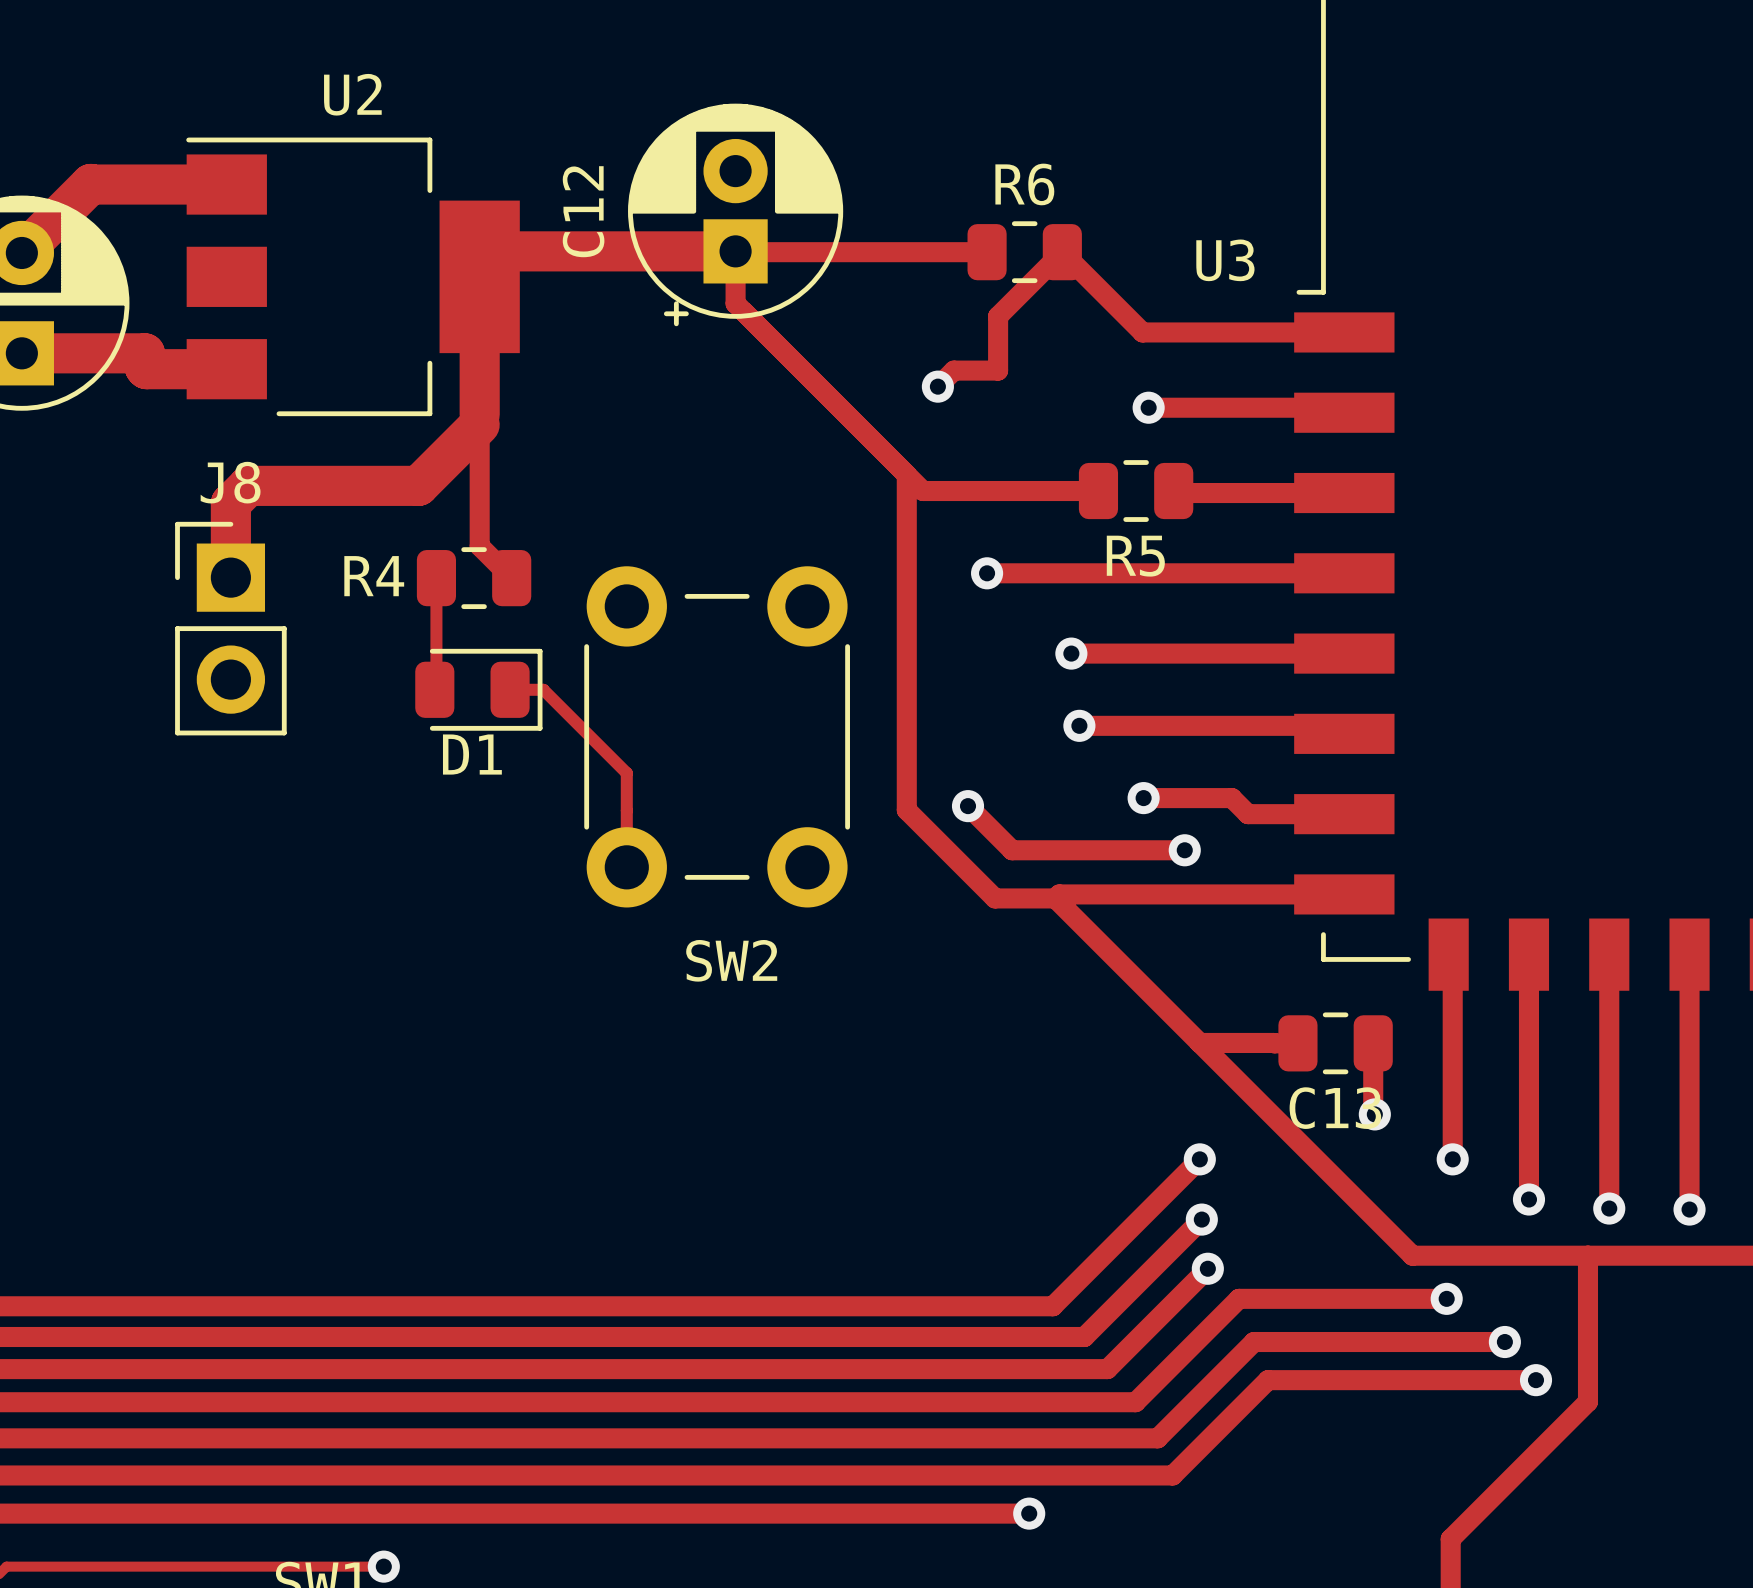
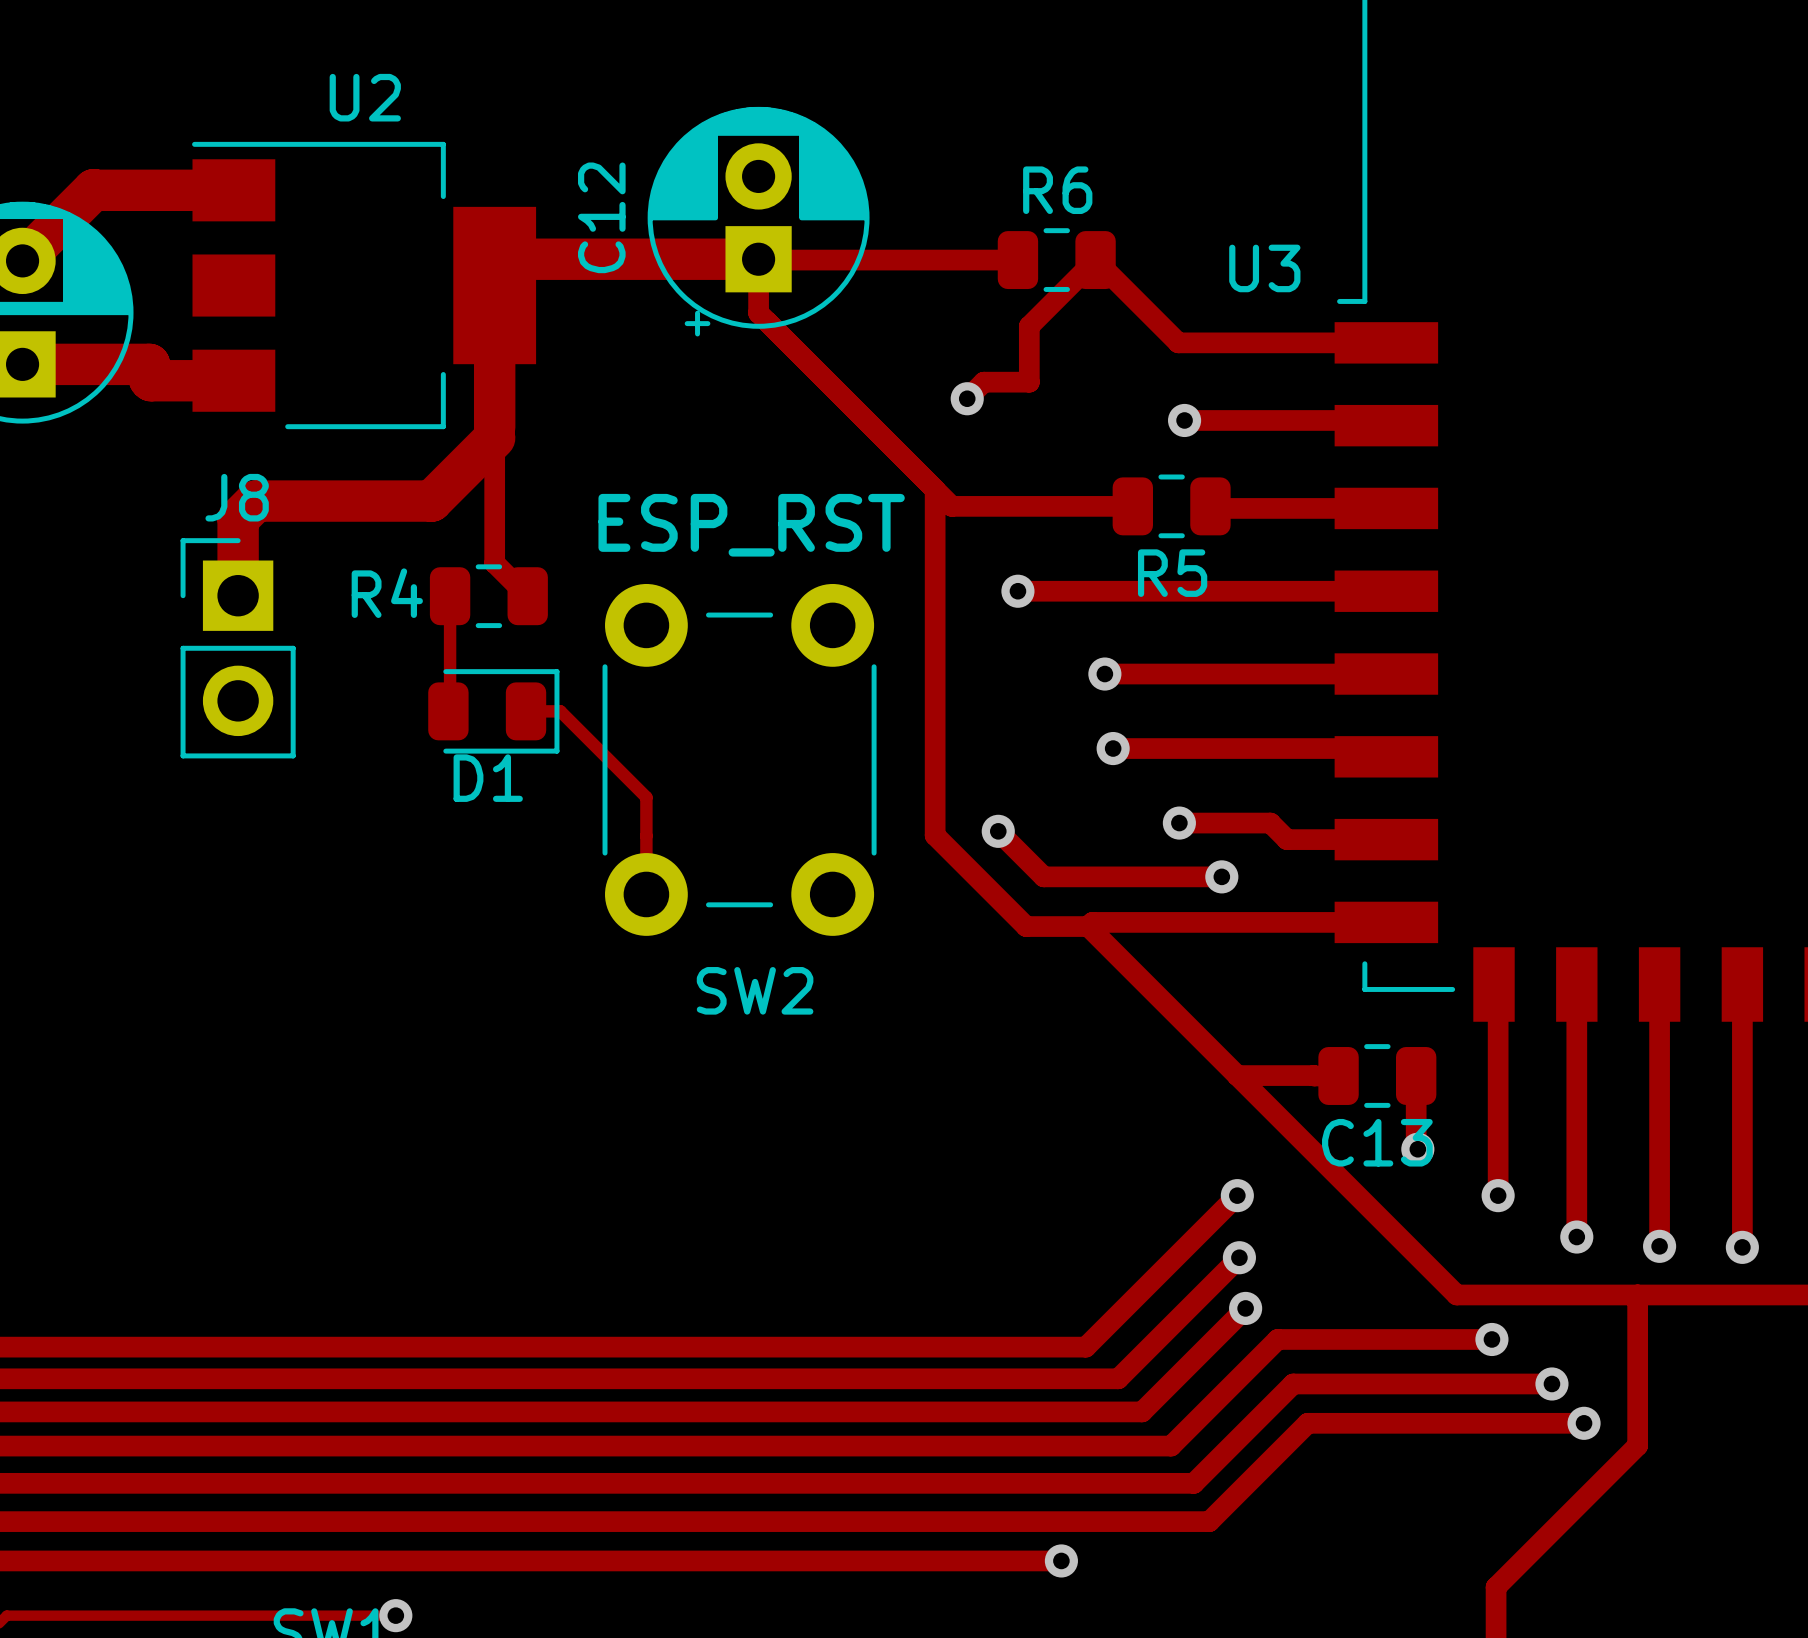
text: none -> ESP_RST (751, 525)

